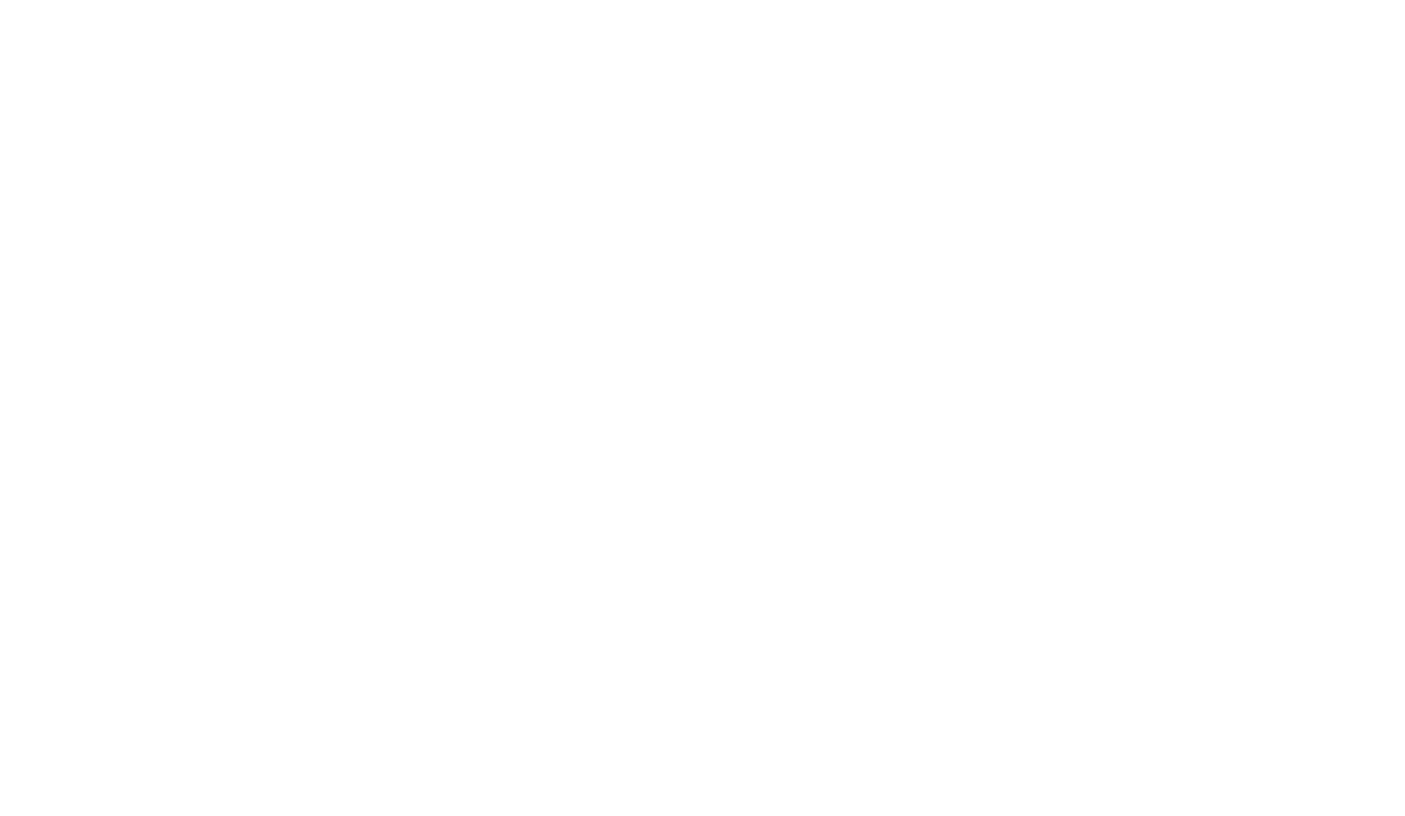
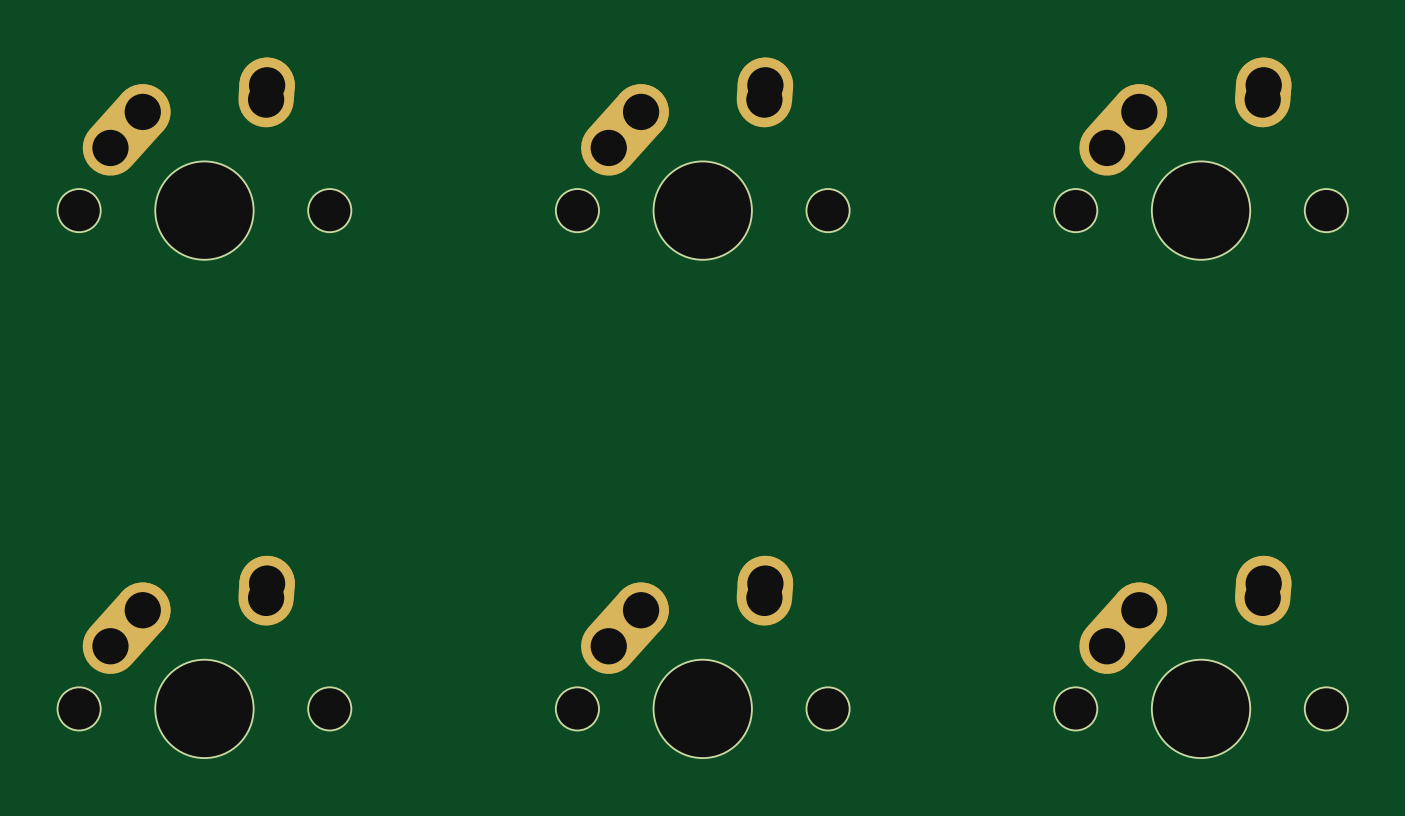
part: none -> (204, 158)
part: none -> (702, 158)
part: none -> (1201, 158)
part: none -> (204, 656)
part: none -> (702, 656)
part: none -> (1201, 656)

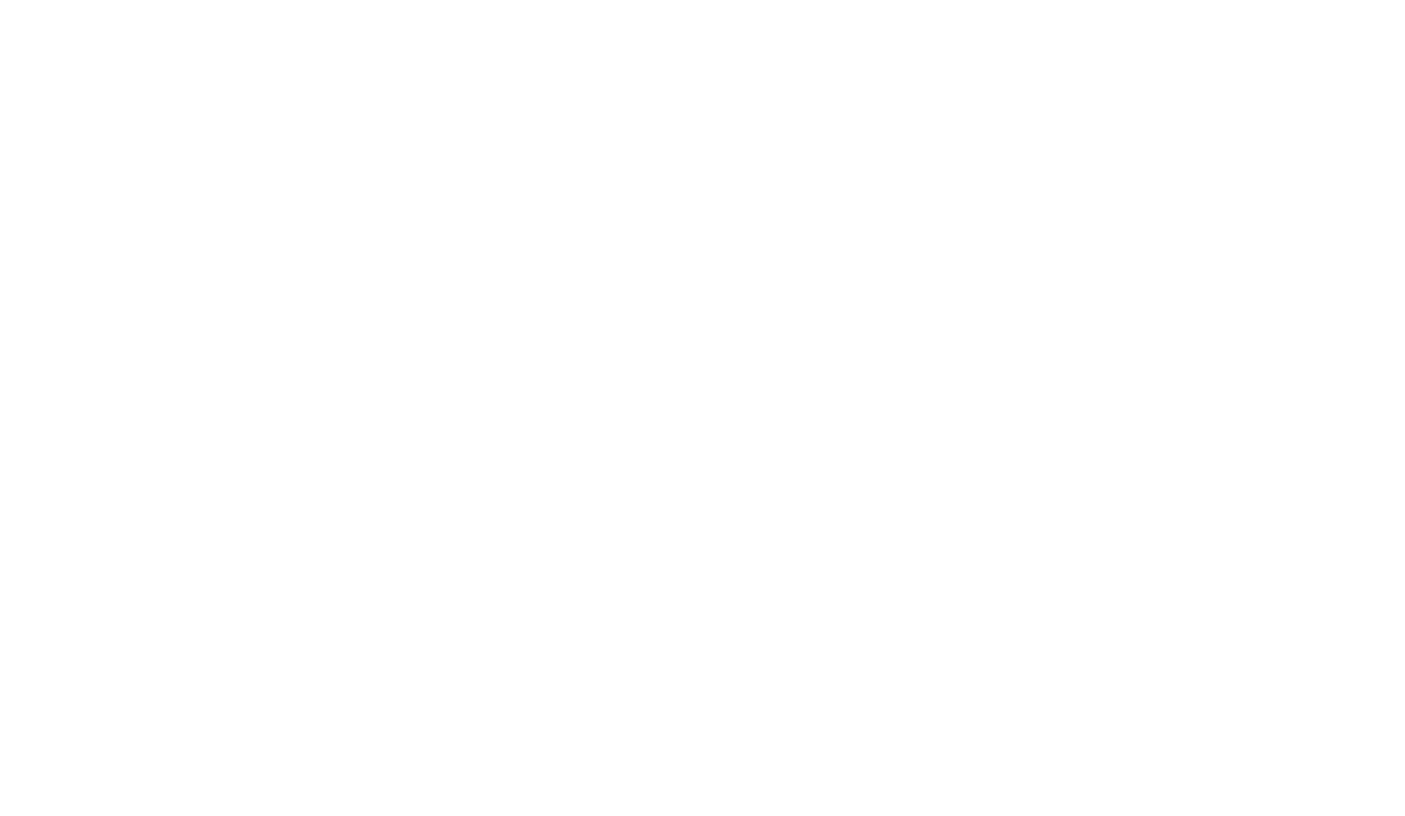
part: (204, 158) -> none
part: (702, 158) -> none
part: (1201, 158) -> none
part: (204, 656) -> none
part: (702, 656) -> none
part: (1201, 656) -> none

